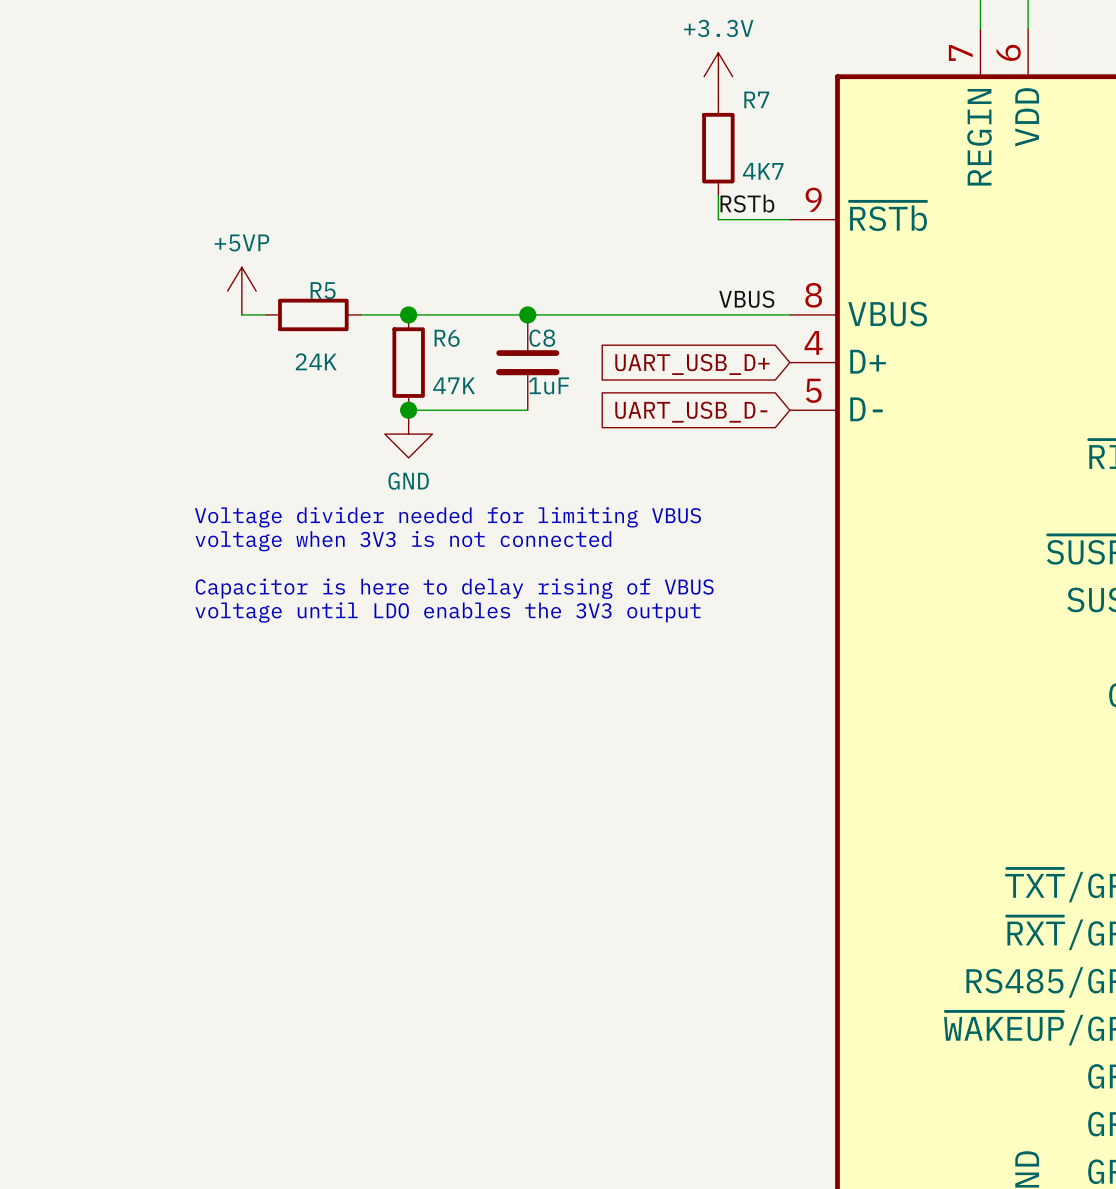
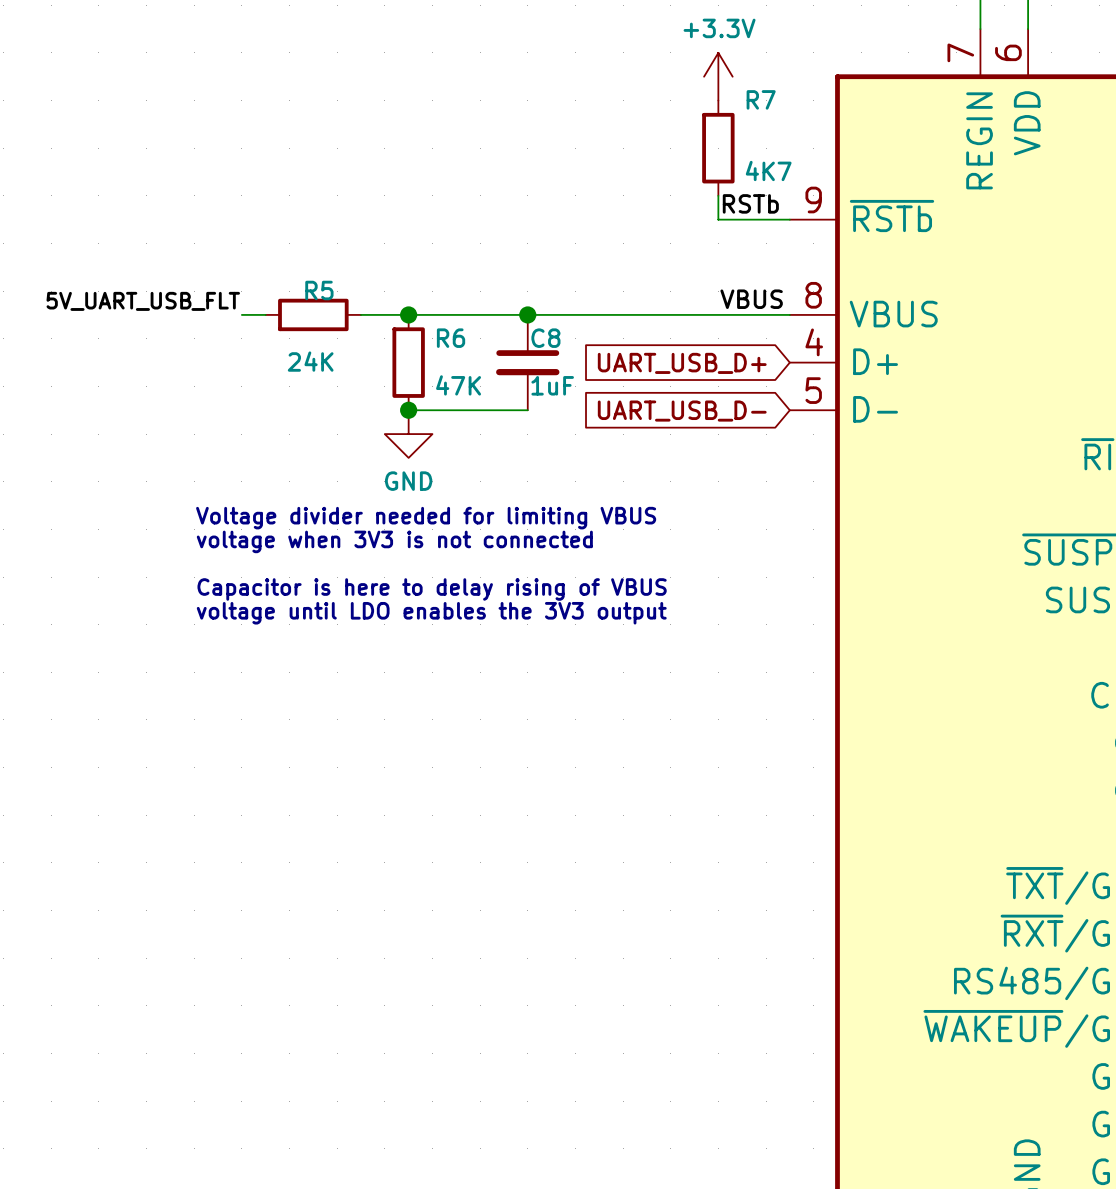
power symbol: +5VP (241, 291) -> none
label: none -> 5V_UART_USB_FLT (143, 301)

